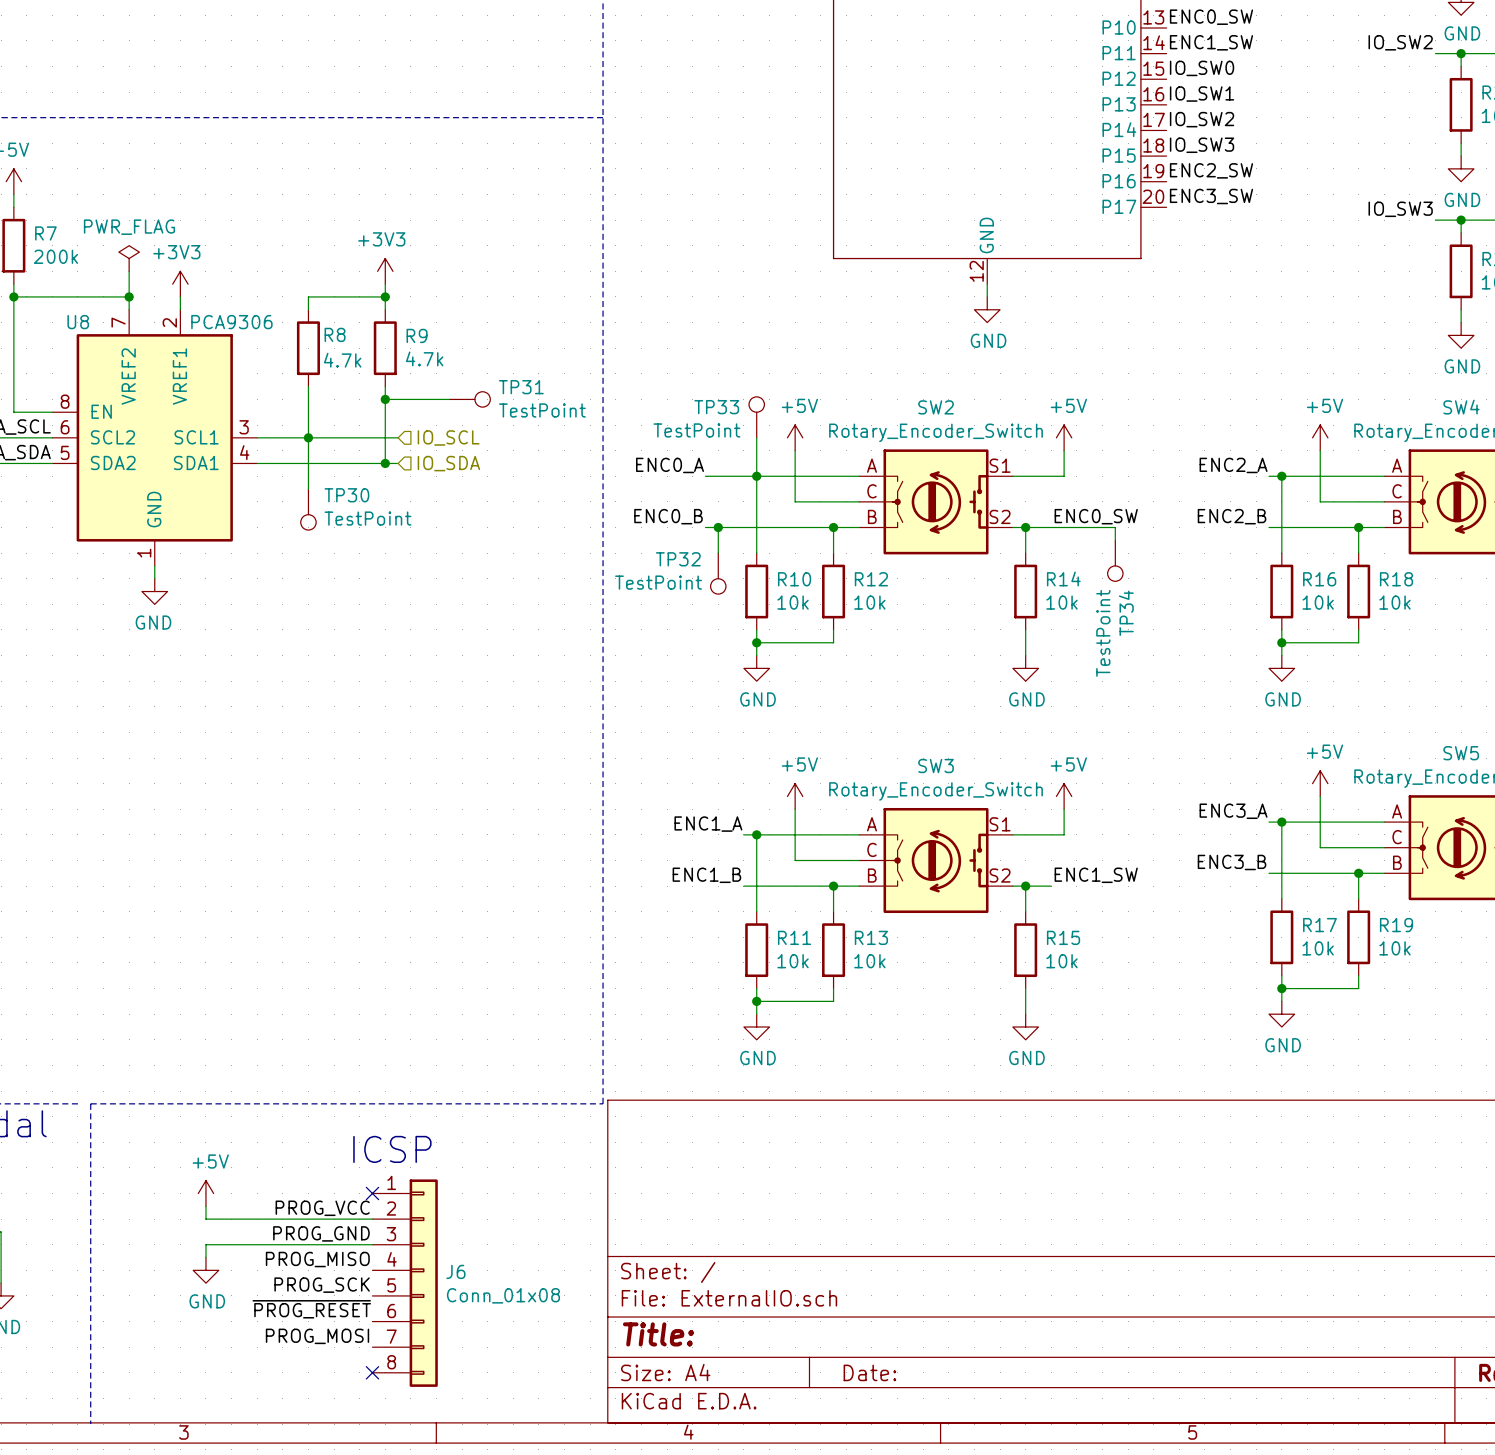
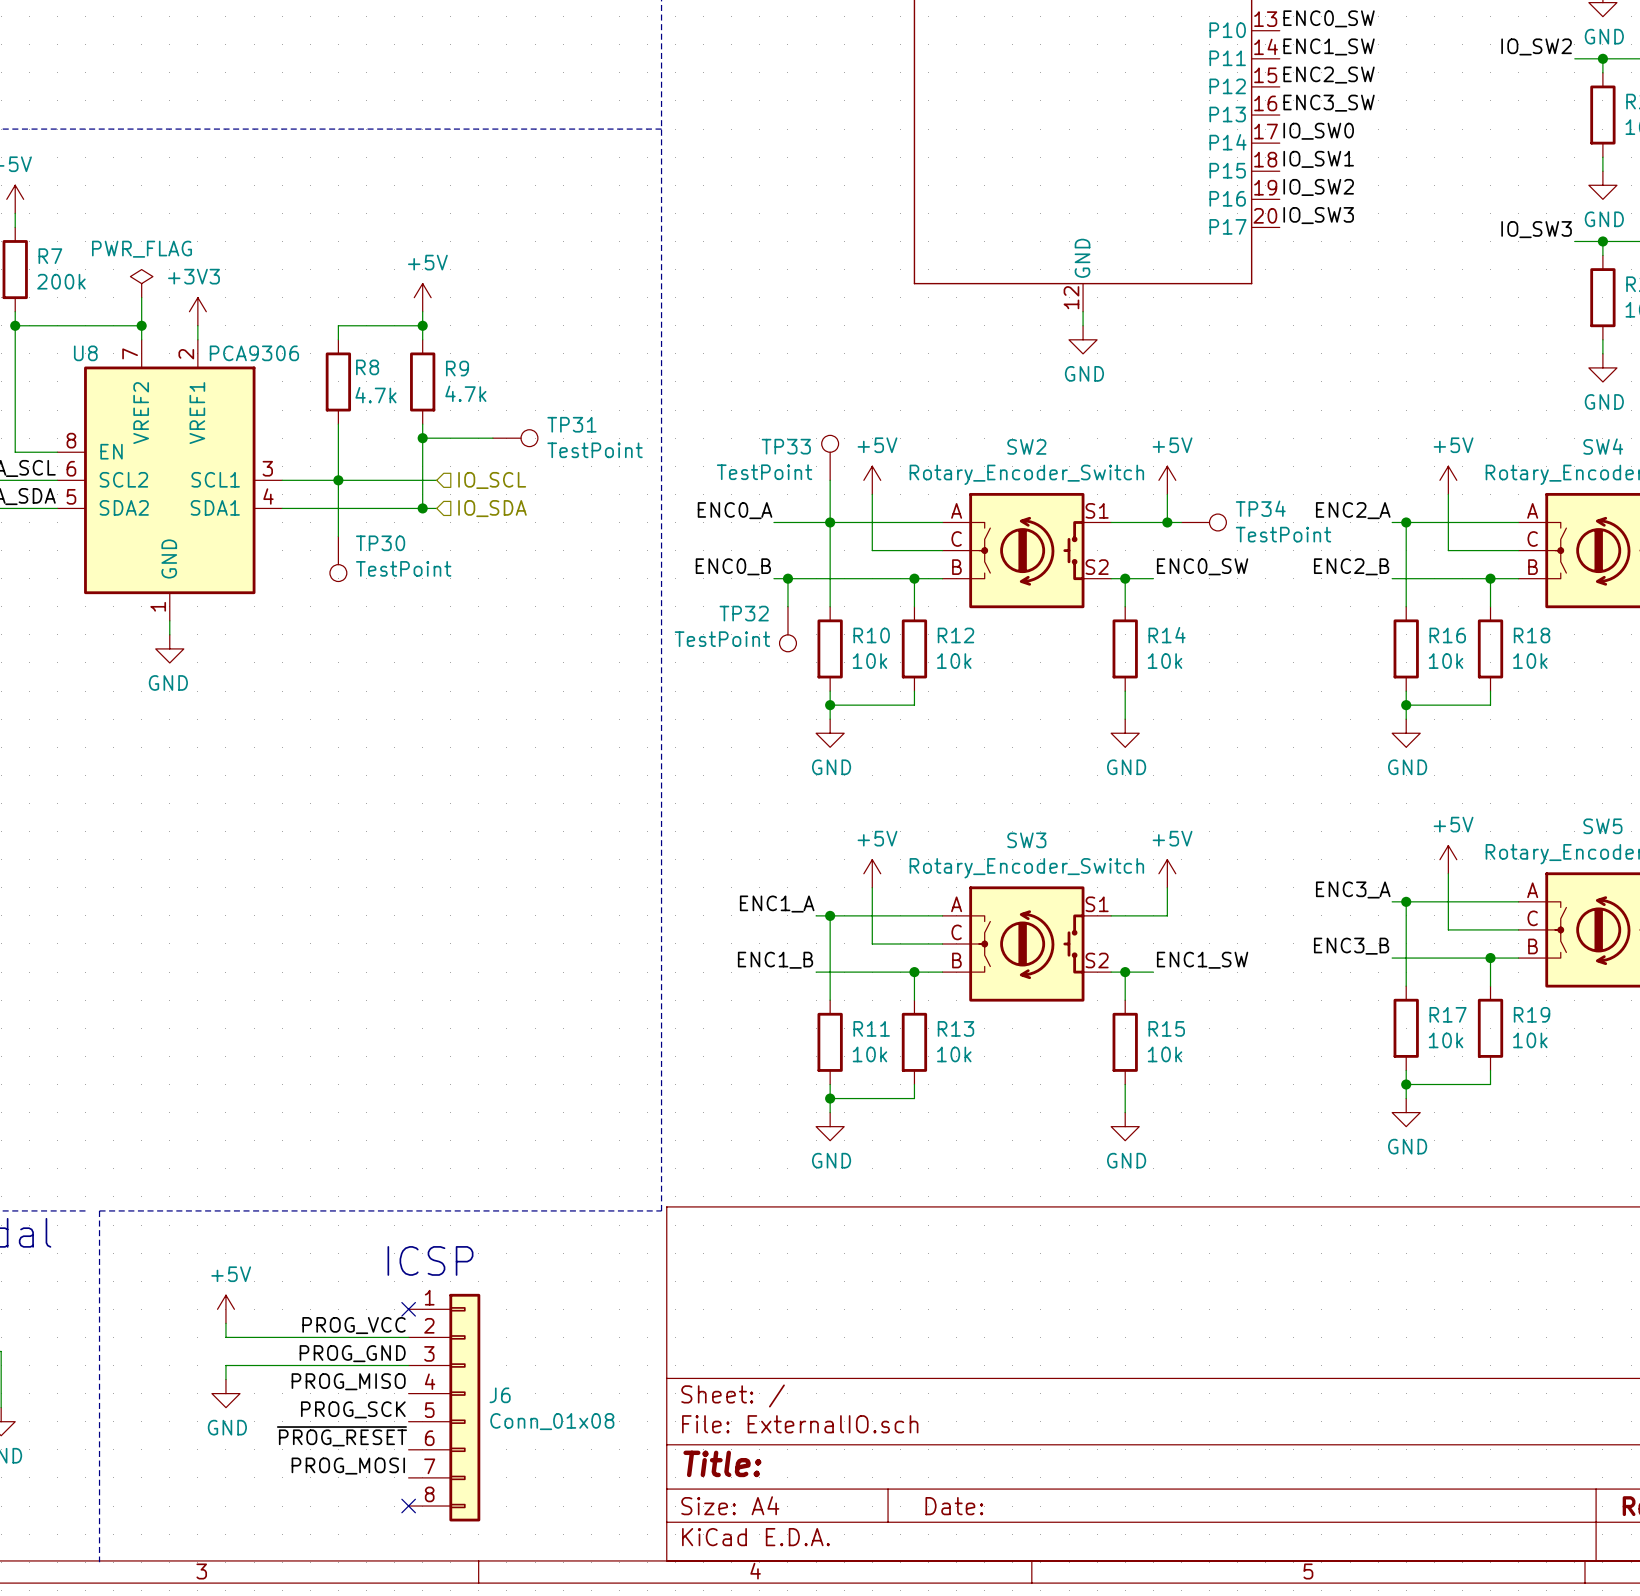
label: IO_SW0 (1202, 68) -> ENC2_SW (1329, 75)
label: IO_SW1 (1202, 94) -> ENC3_SW (1329, 103)
label: IO_SW2 (1202, 119) -> IO_SW0 (1318, 131)
label: IO_SW3 (1202, 145) -> IO_SW1 (1318, 159)
label: ENC2_SW (1211, 170) -> IO_SW2 (1318, 187)
label: ENC3_SW (1211, 196) -> IO_SW3 (1318, 215)
power symbol: +3V3 (385, 271) -> +5V (422, 297)
wire: none -> (1167, 522) (1181, 522)
junction: none -> (1167, 522)
wire: (1051, 527) (1115, 527) (1115, 540) -> none
TP34 position: (1115, 560) -> (1203, 522)
TP34 rotation: 0° (1115, 573) -> 90° counterclockwise (1217, 522)

